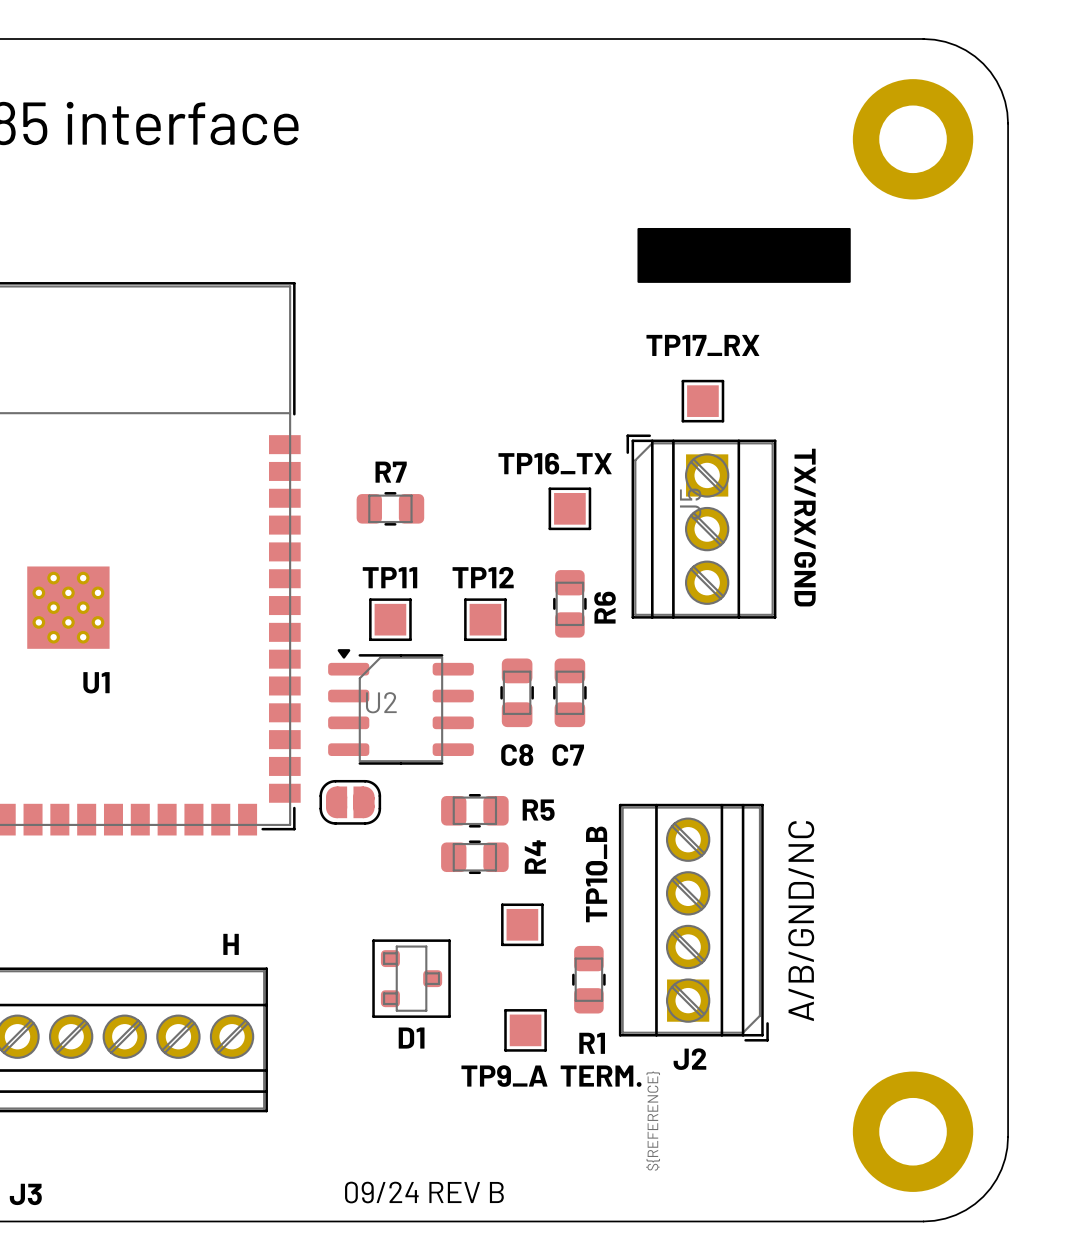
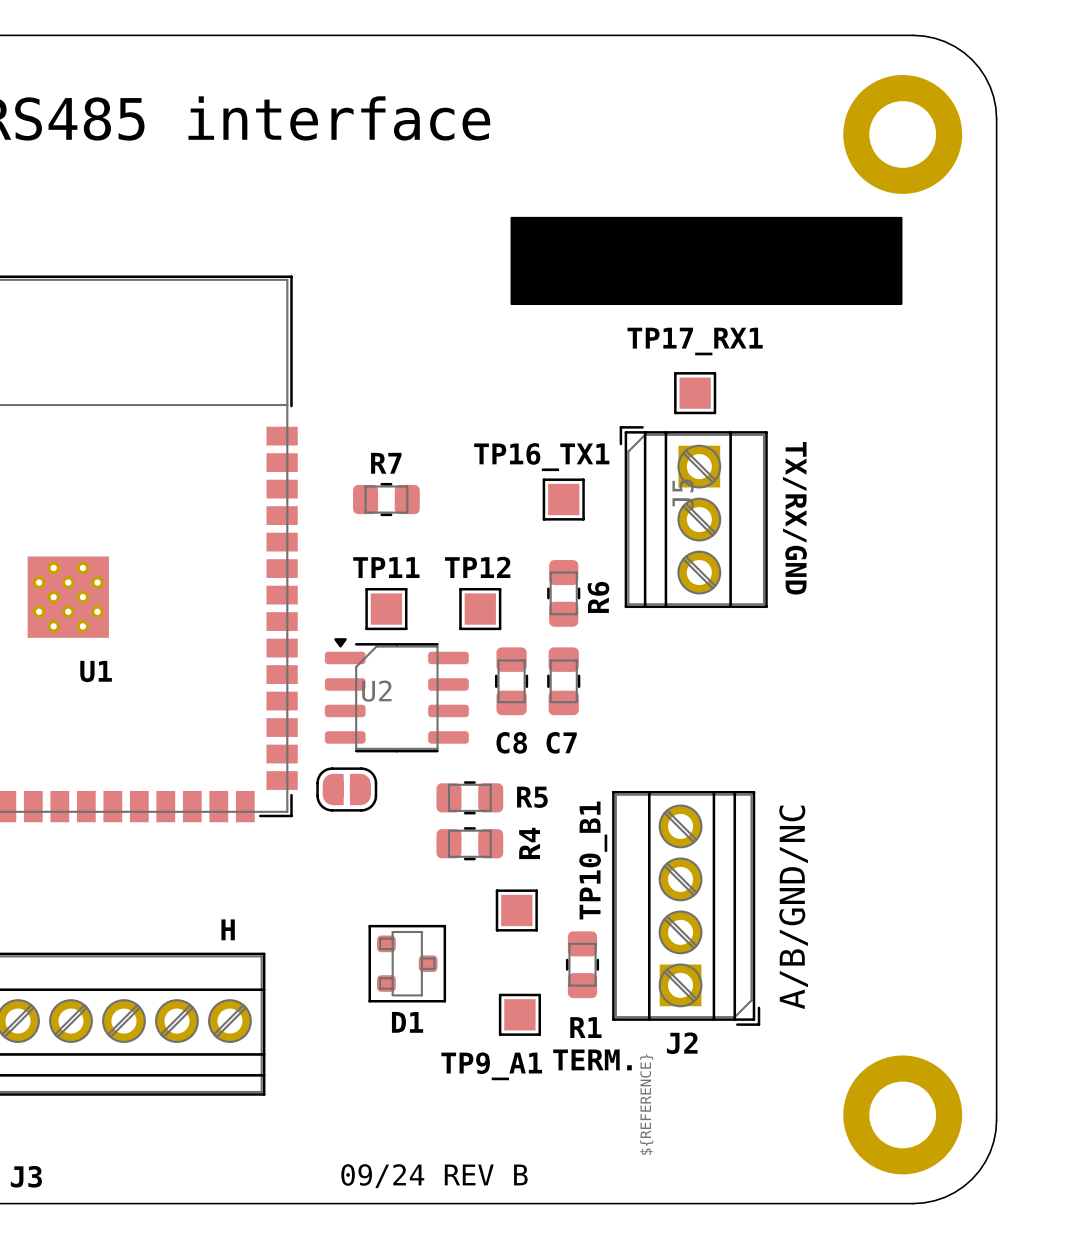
drawing: none -> [510, 216, 903, 306]
drawing: [637, 227, 851, 283] -> none
TP17_RX name: TP17_RX (702, 345) -> TP17_RX1 (695, 341)
TP16_TX name: TP16_TX (555, 463) -> TP16_TX1 (541, 457)
TP10_B name: TP10_B (596, 874) -> TP10_B1 (593, 860)
TP9_A name: TP9_A (504, 1076) -> TP9_A1 (491, 1066)

